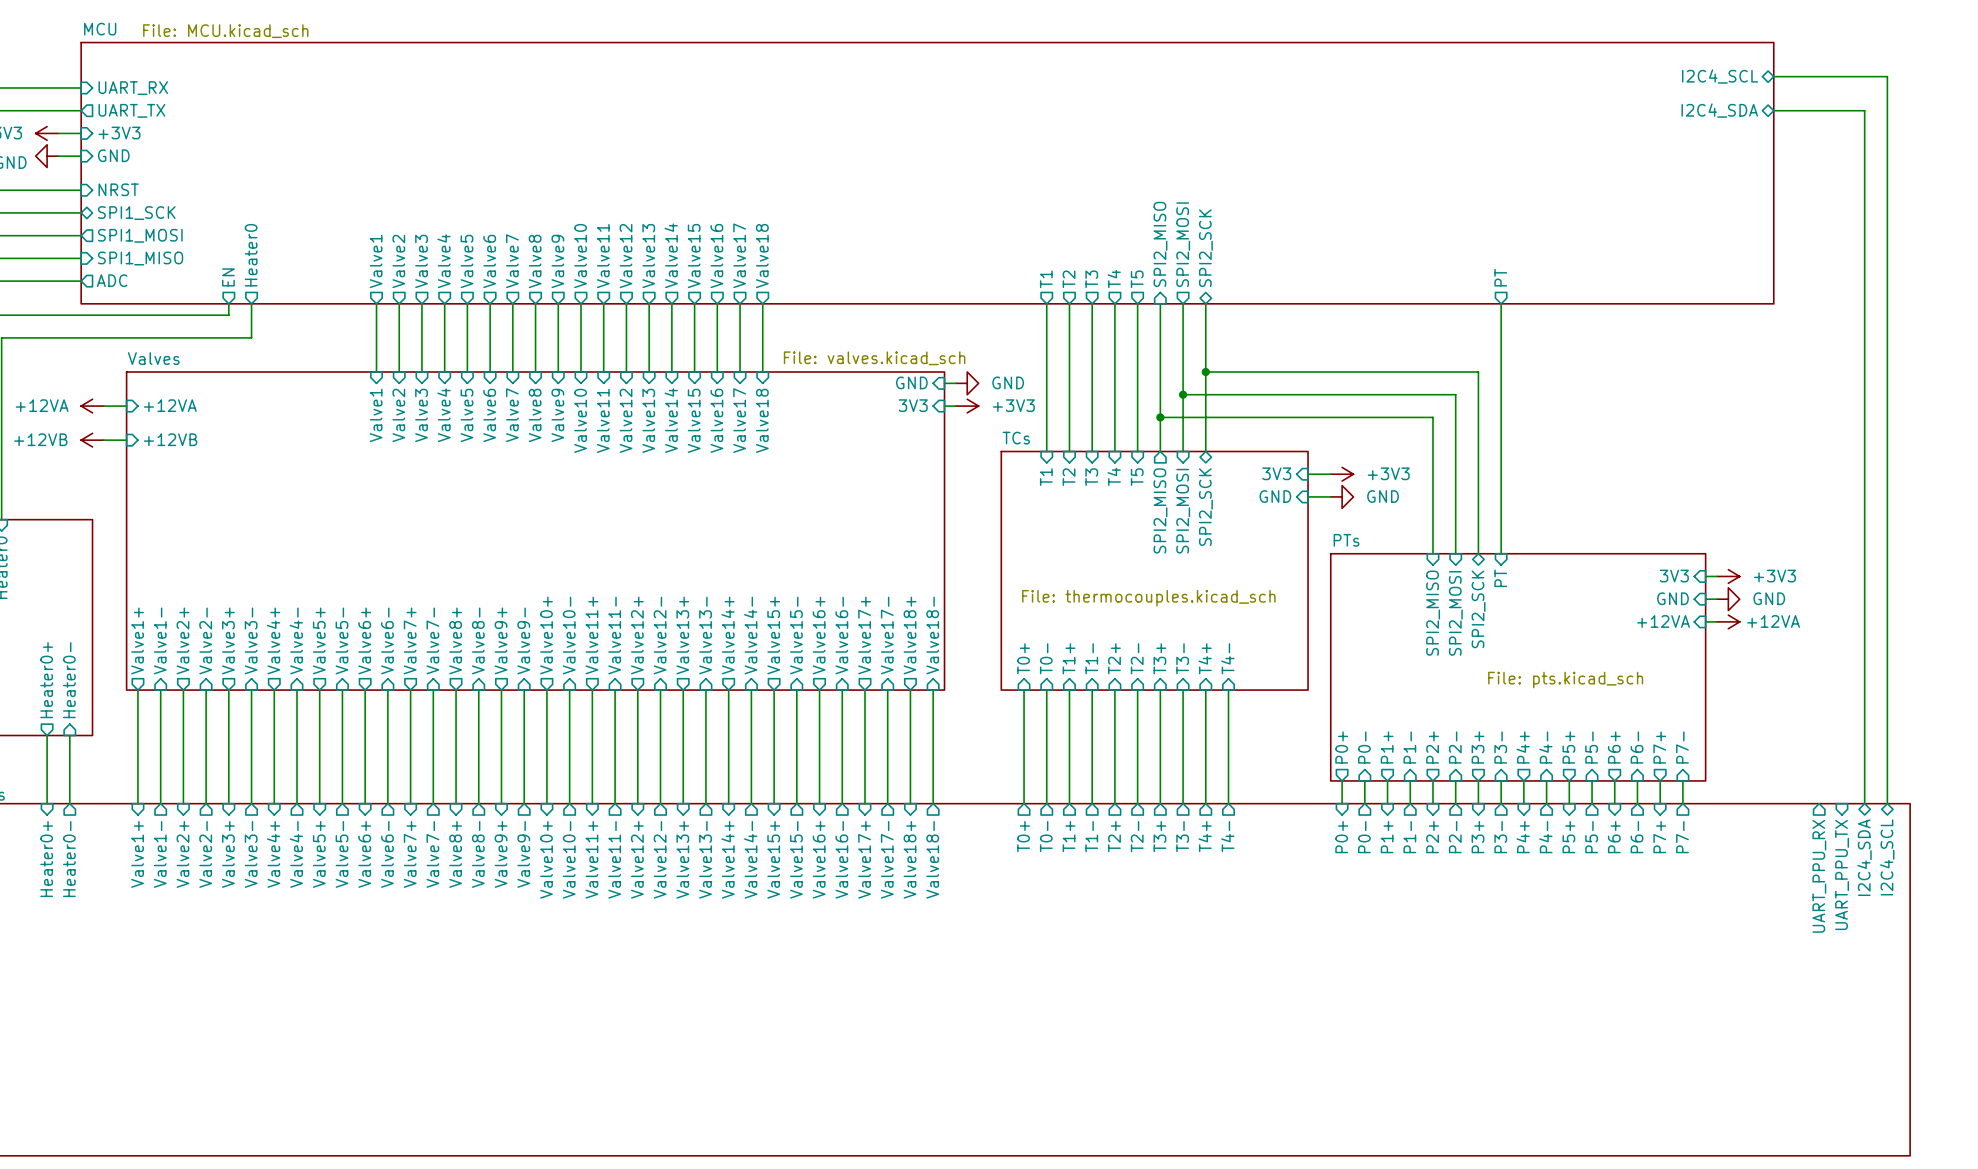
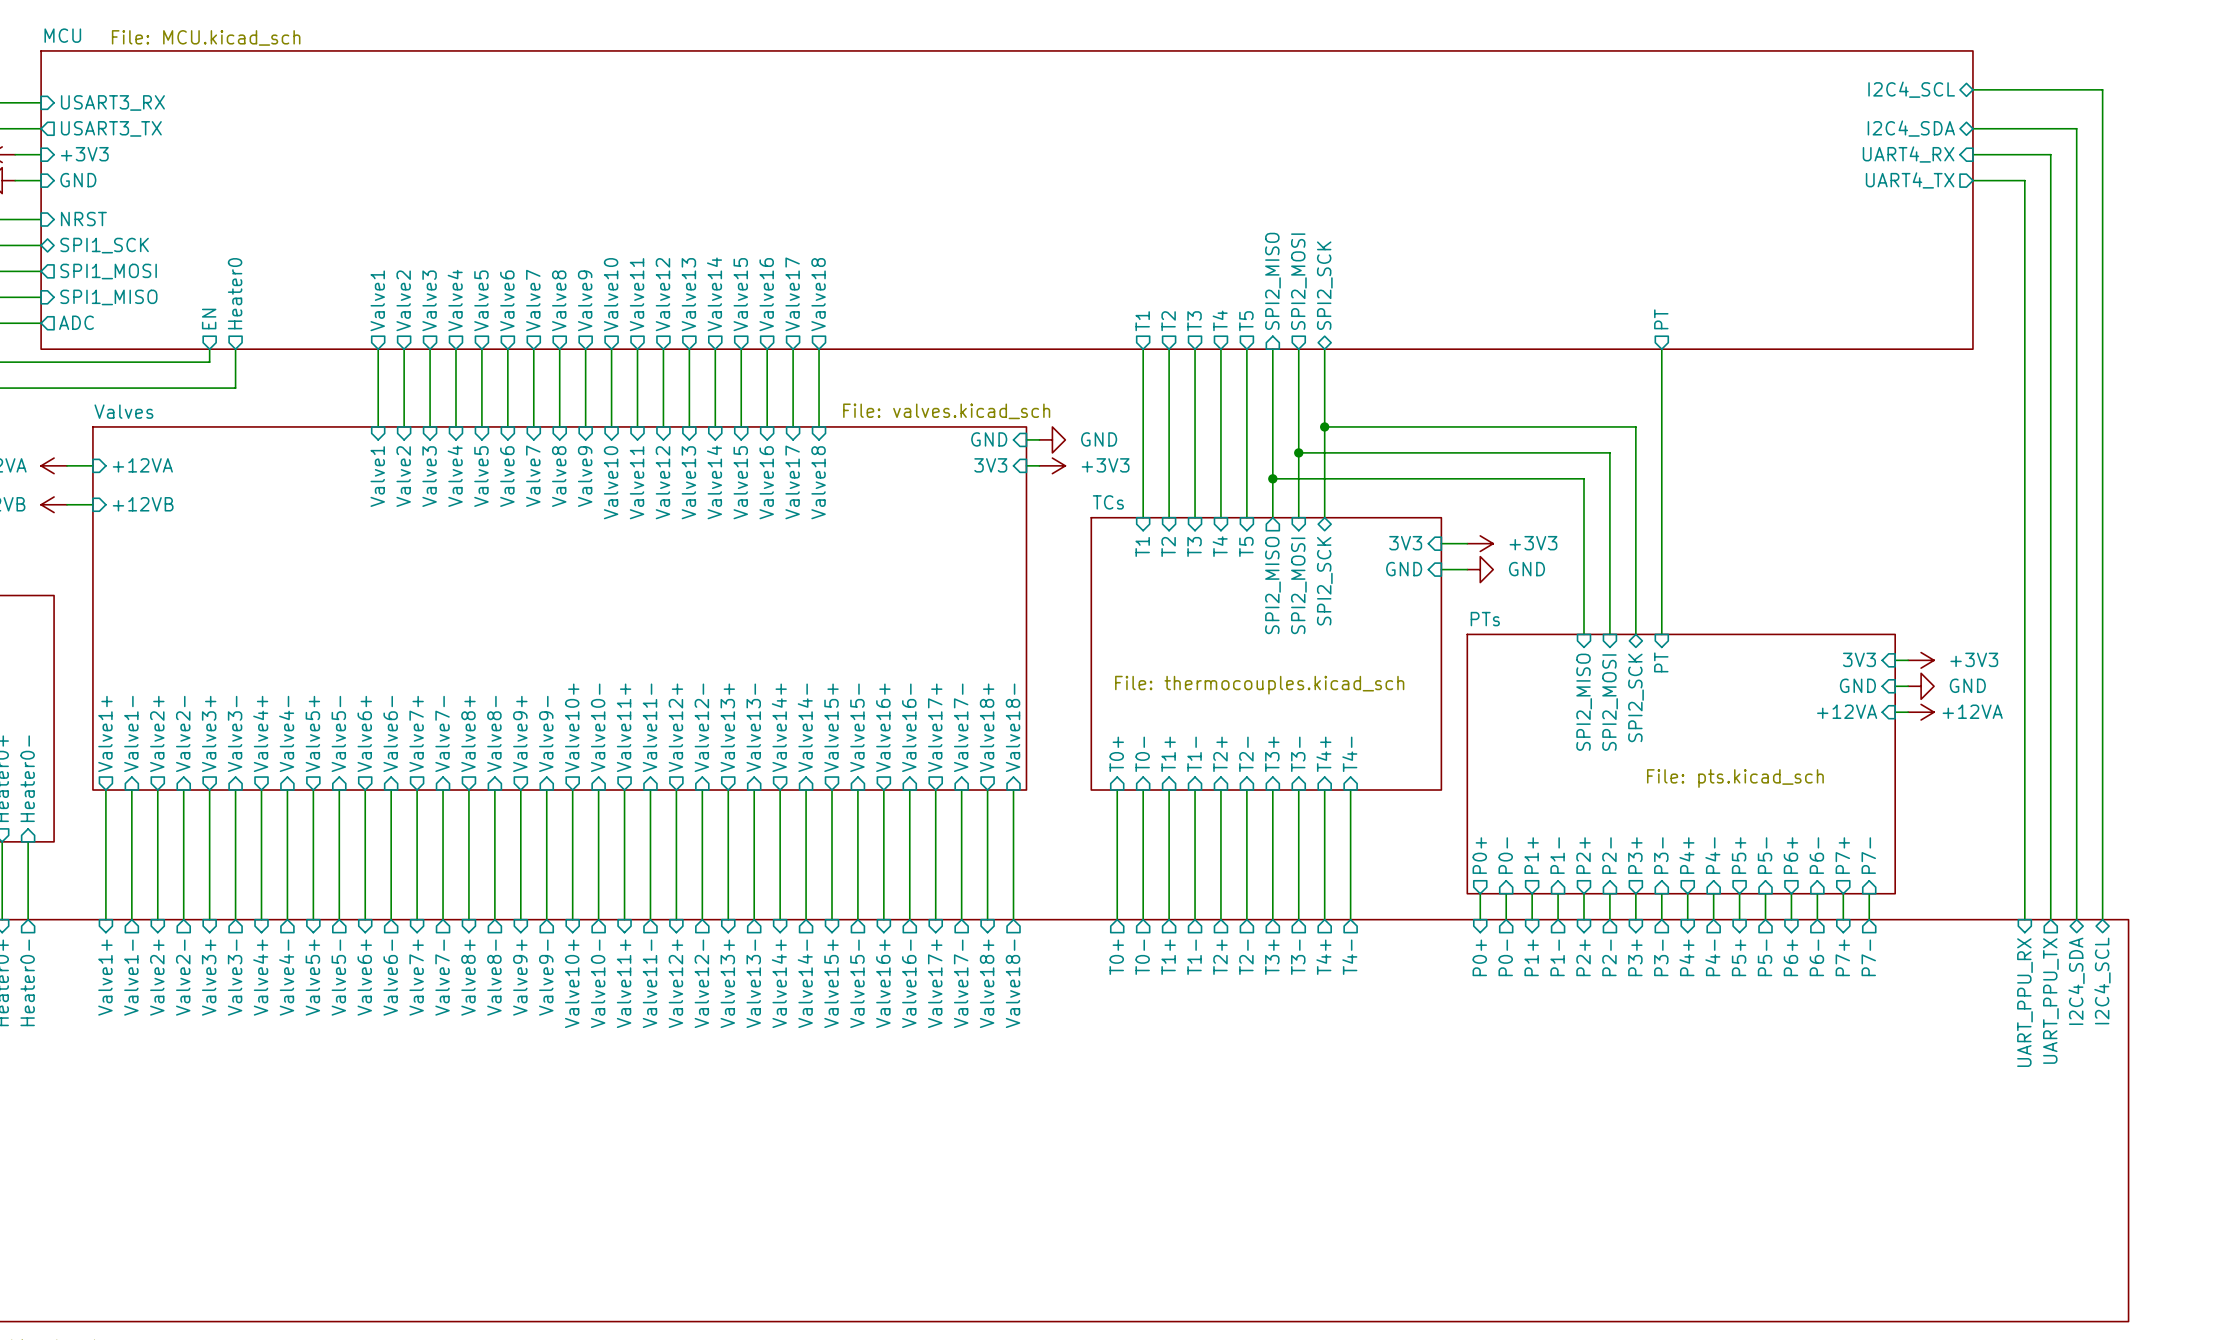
sheet pin: UART_RX (133, 88) -> USART3_RX (112, 102)
sheet pin: UART_TX (131, 110) -> USART3_TX (111, 128)
sheet pin: none -> UART4_RX (1908, 154)
wire: none -> (1972, 154) (2050, 154) (2050, 919)
sheet pin: none -> UART4_TX (1910, 180)
wire: none -> (1972, 180) (2024, 180) (2024, 919)
sheet pin shape: input (1842, 874) -> output (2050, 1001)
sheet pin shape: output (1819, 876) -> input (2024, 1002)

